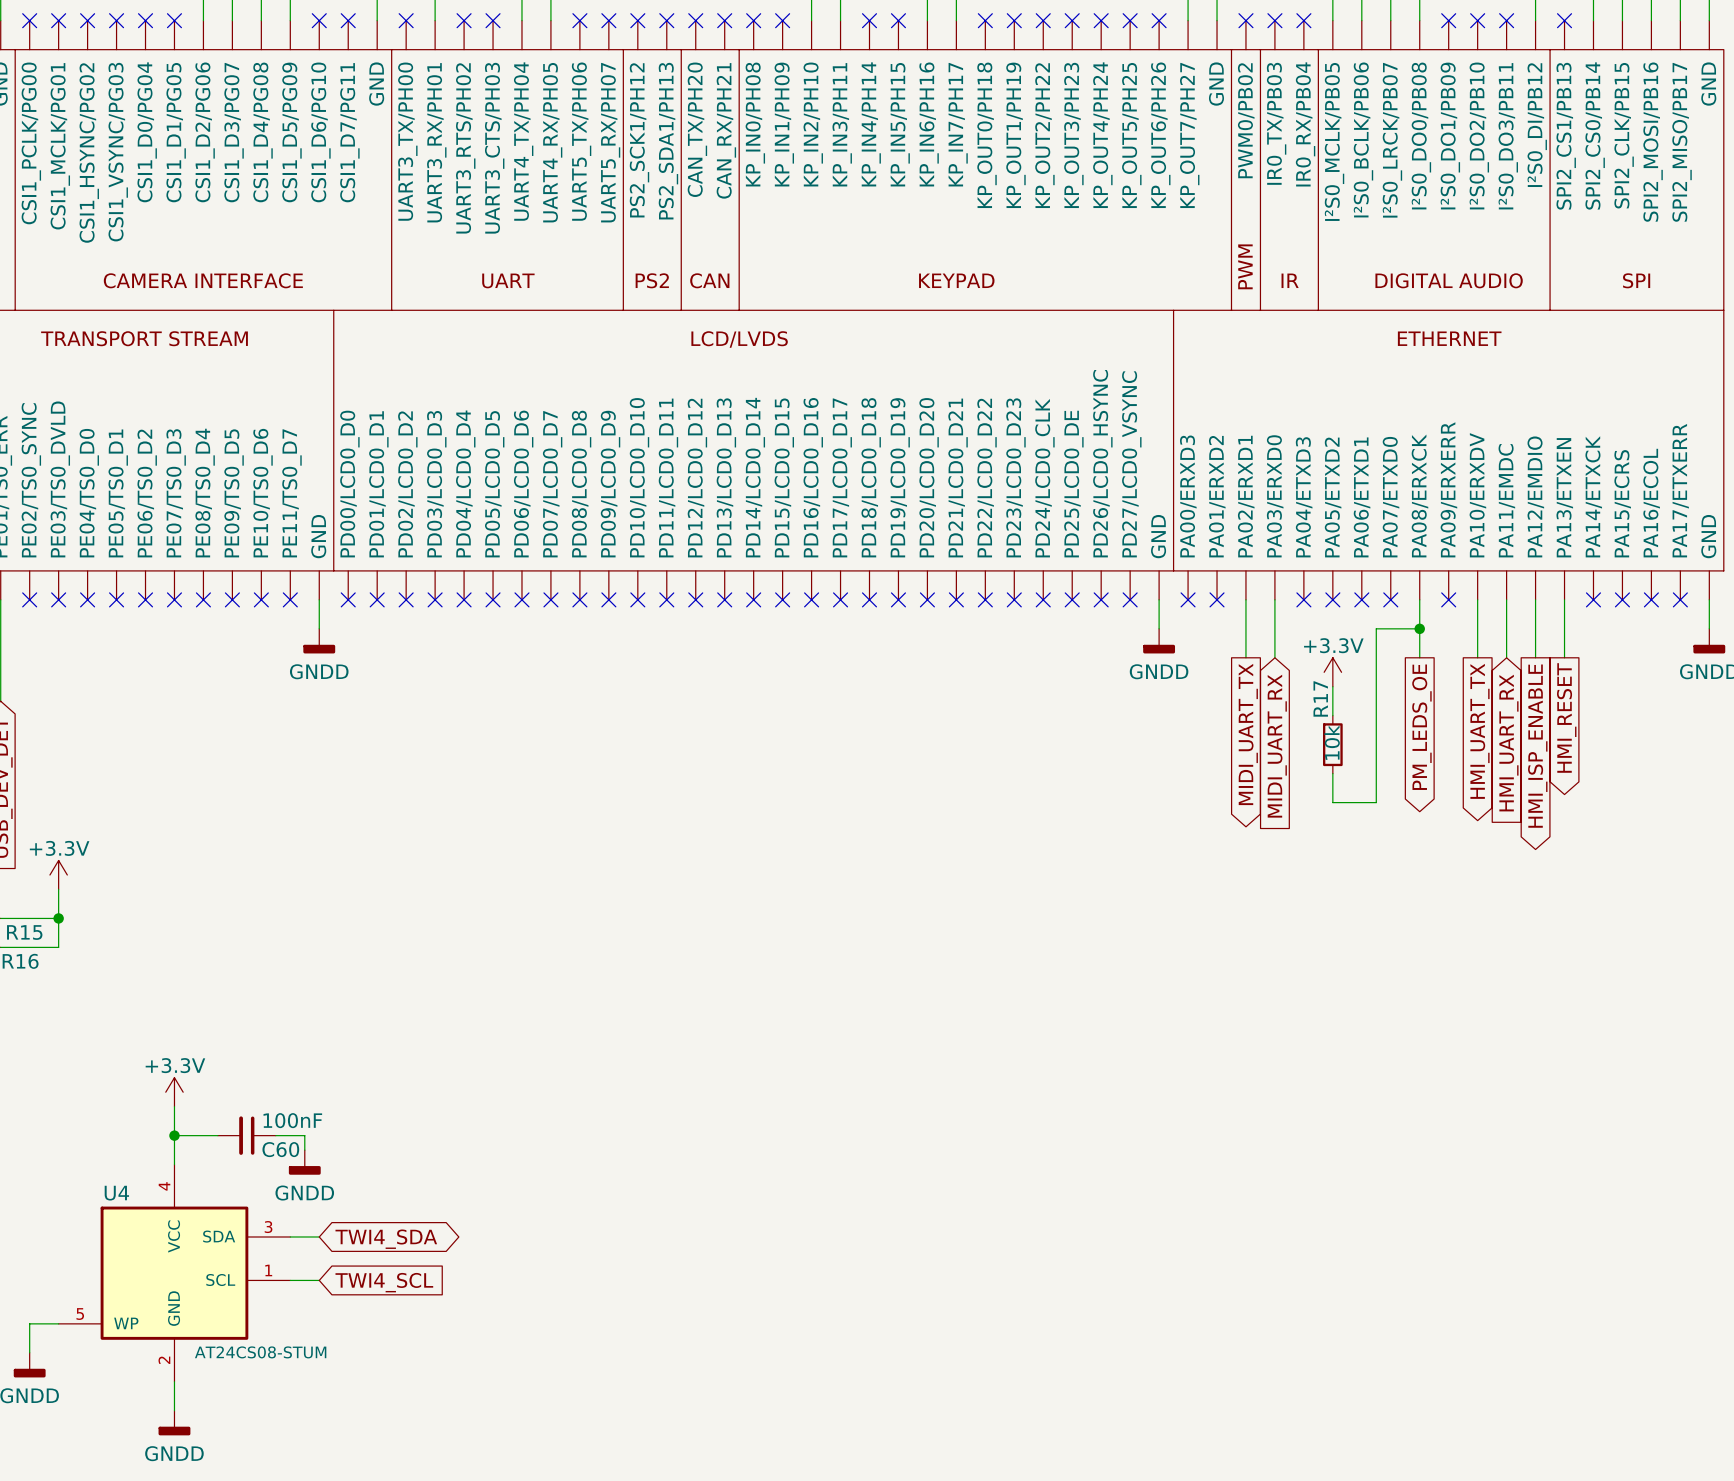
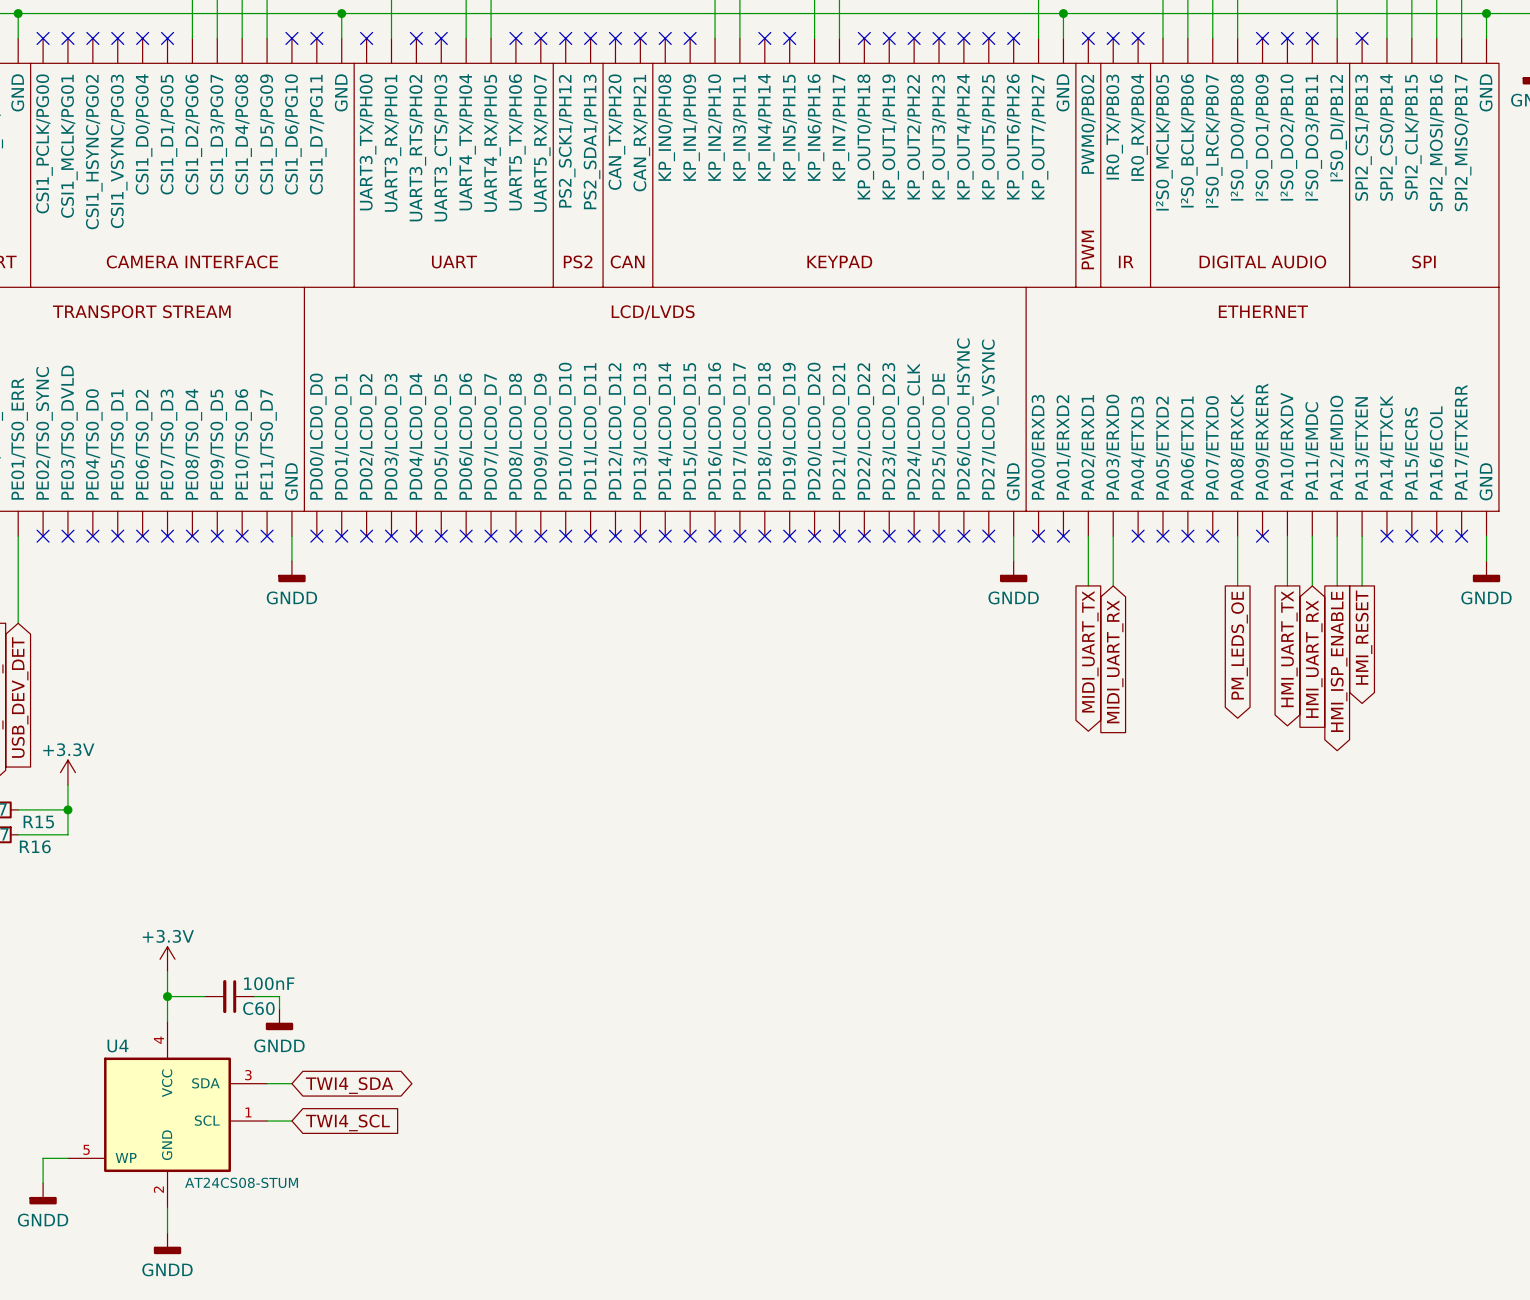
wire: (1419, 628) (1376, 628) (1376, 802) (1332, 802) (1332, 773) -> none
junction: (1419, 628) -> none
power symbol: +3.3V (1332, 672) -> none
wire: (1332, 686) (1332, 715) -> none
R17: 10k (1332, 744) -> none

